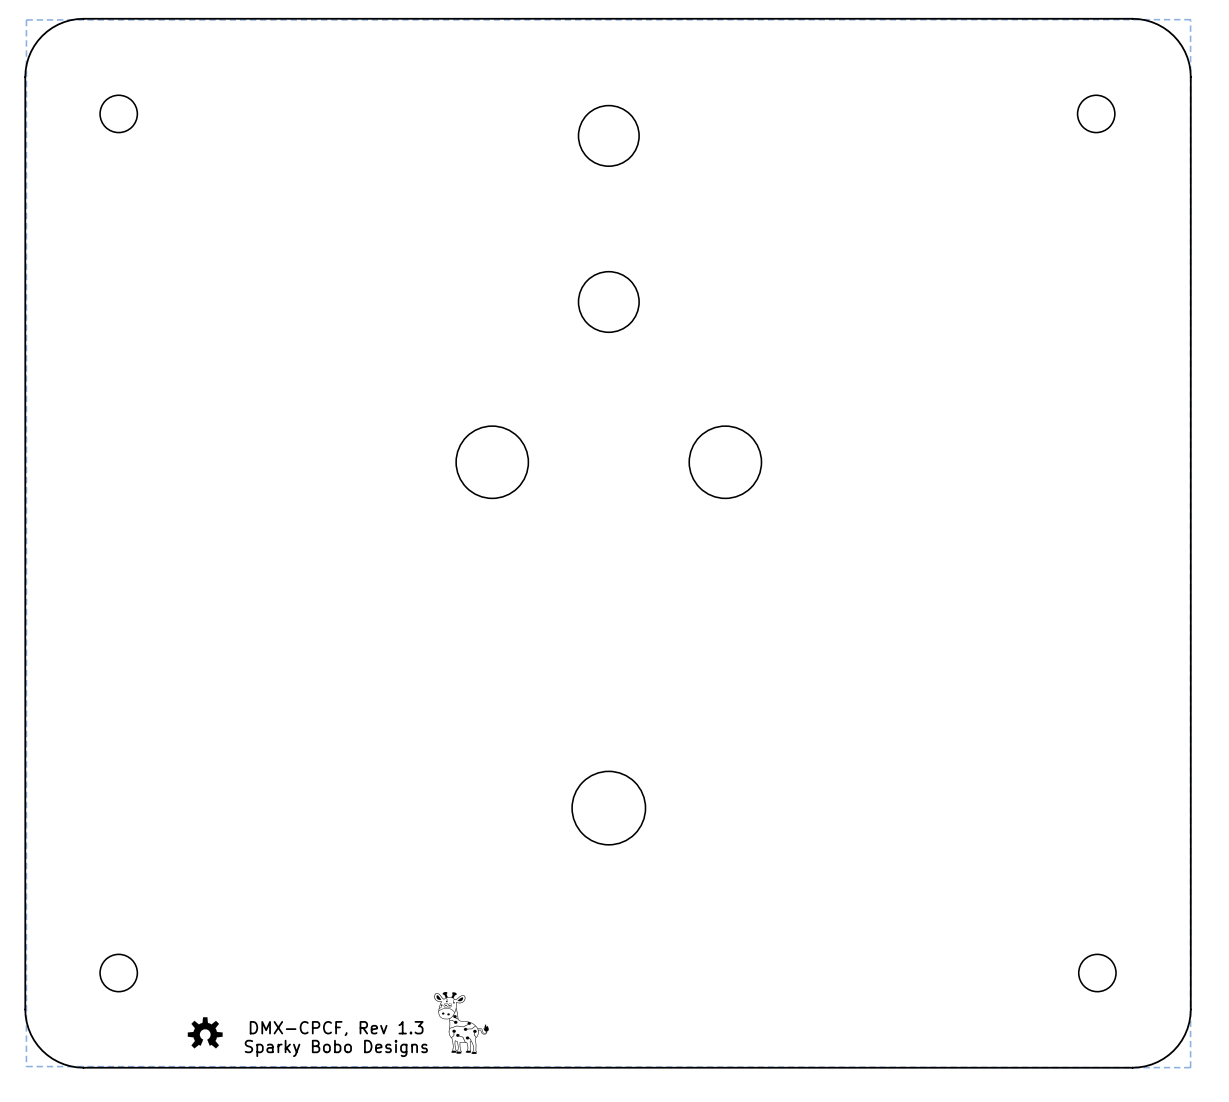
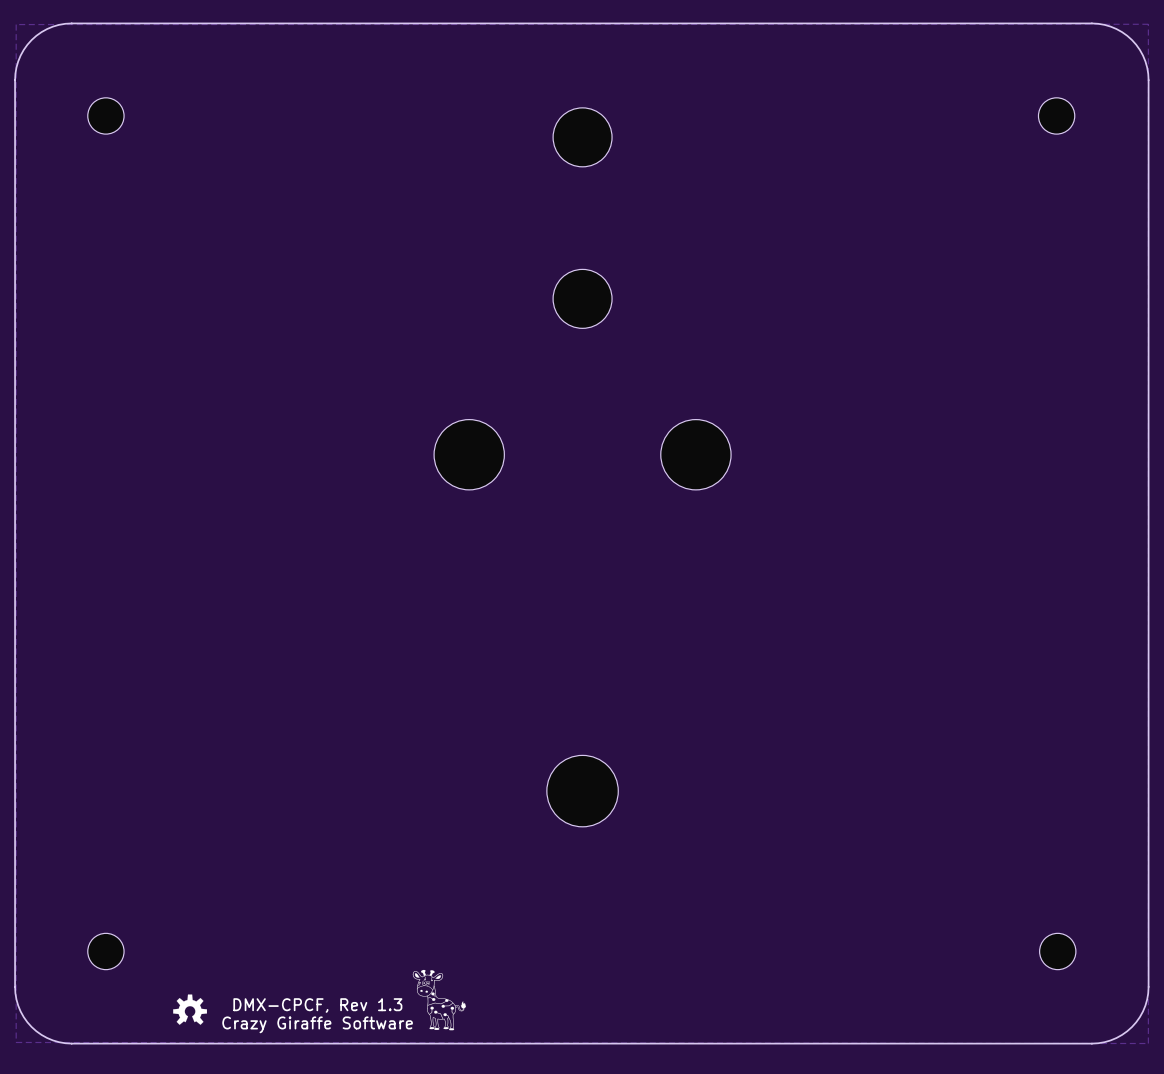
text: Sparky Bobo Designs (336, 1048) -> Crazy Giraffe Software (317, 1024)

